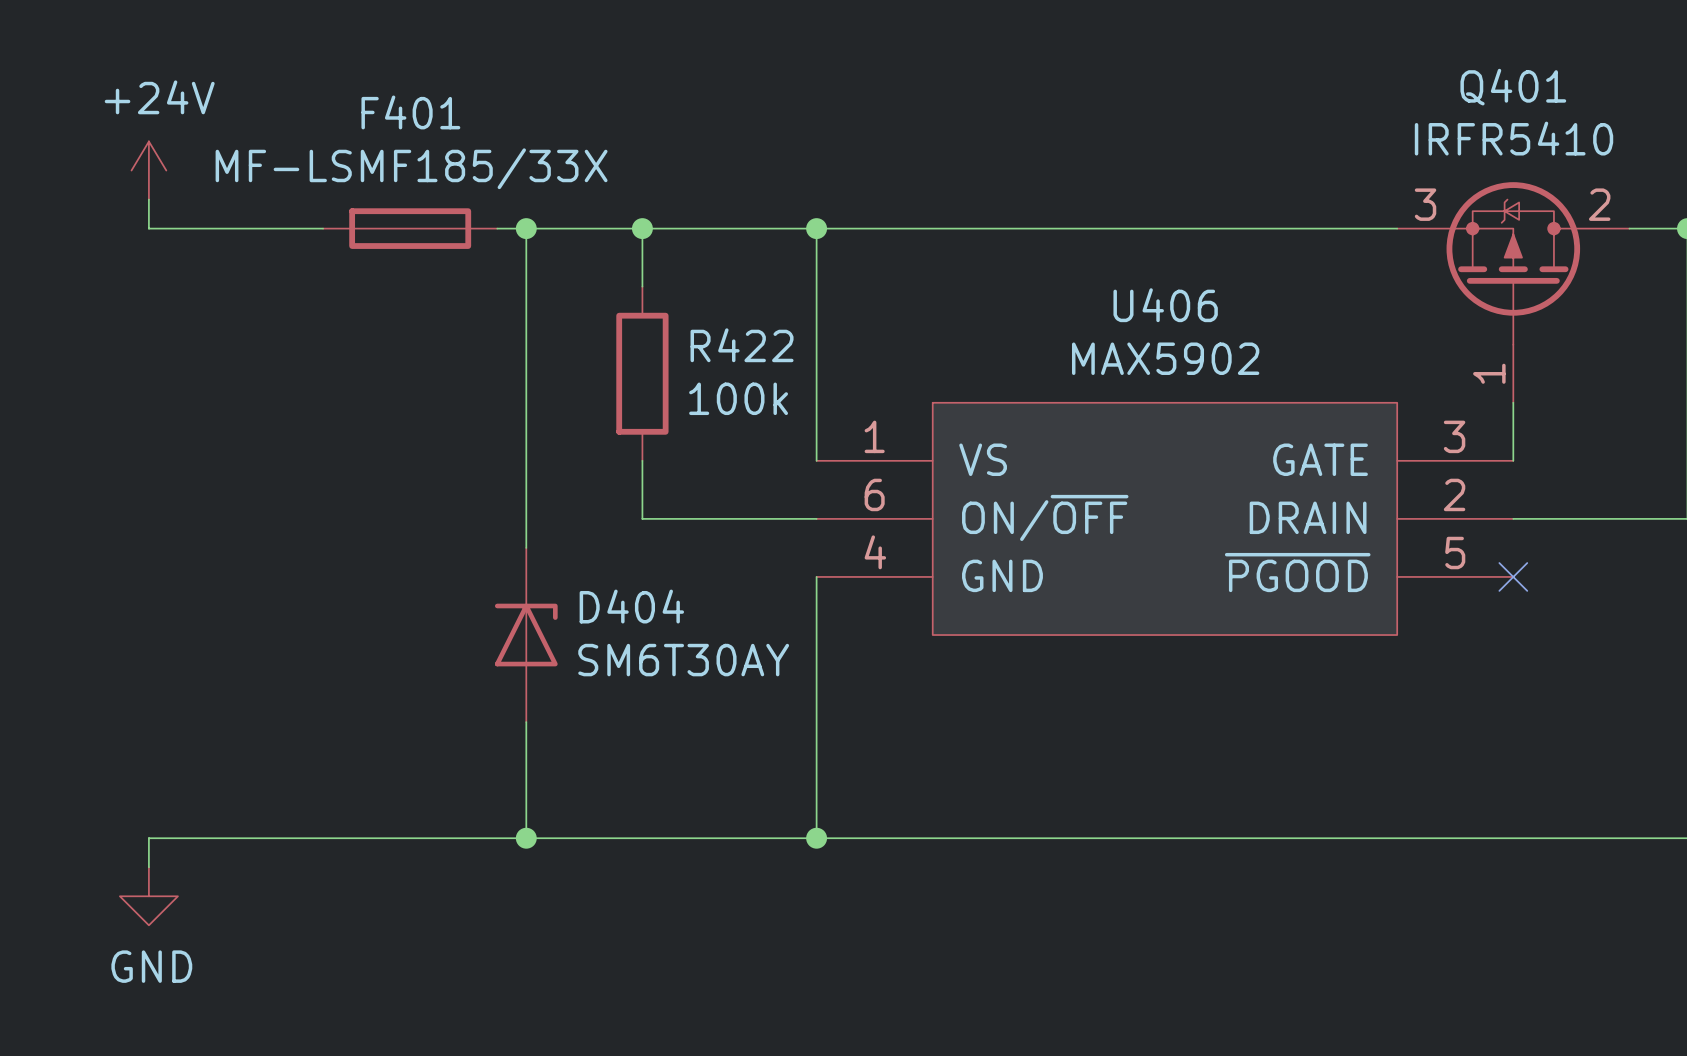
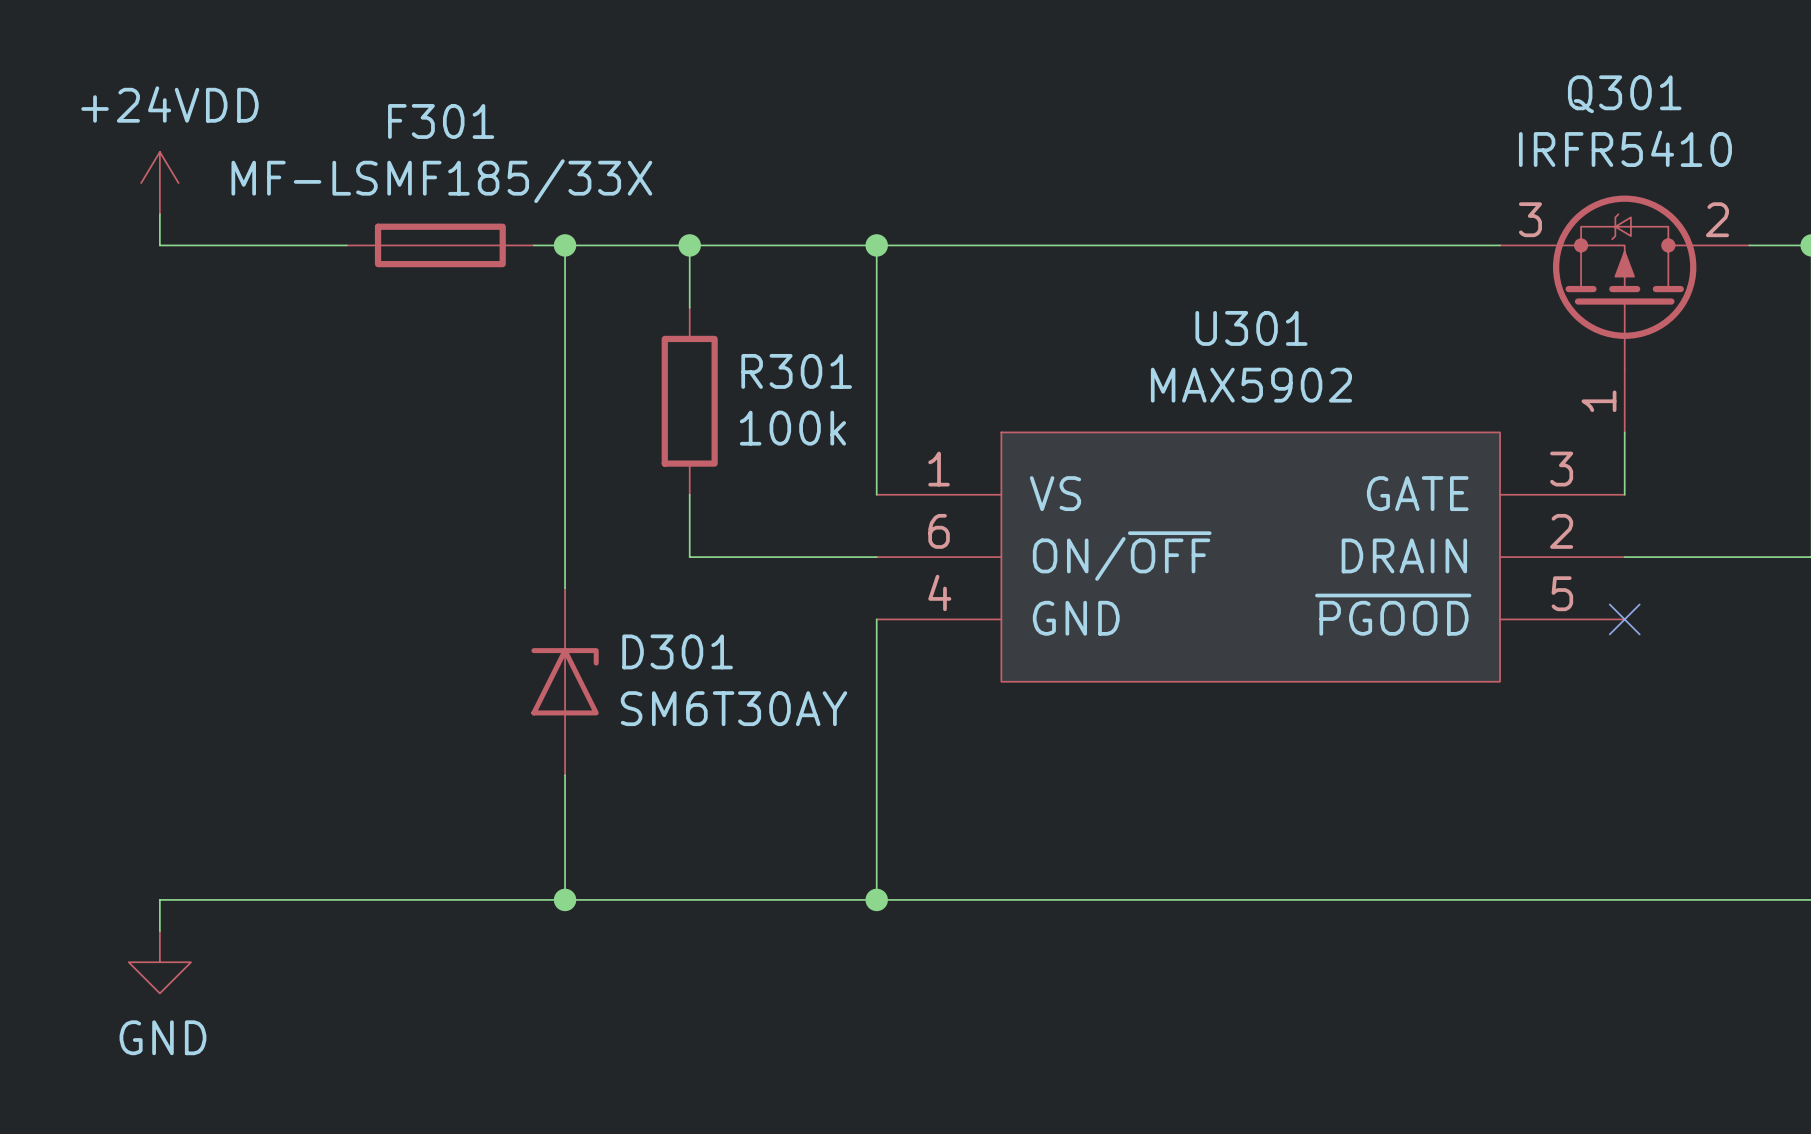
Q401 name: Q401 (1513, 87) -> Q301 (1624, 94)
F401 name: F401 (410, 112) -> F301 (441, 121)
power symbol: +24V (148, 170) -> +24VDD (159, 183)
U406 name: U406 (1165, 305) -> U301 (1251, 328)
R422 name: R422 (742, 345) -> R301 (796, 371)
D404 name: D404 (631, 606) -> D301 (677, 651)

